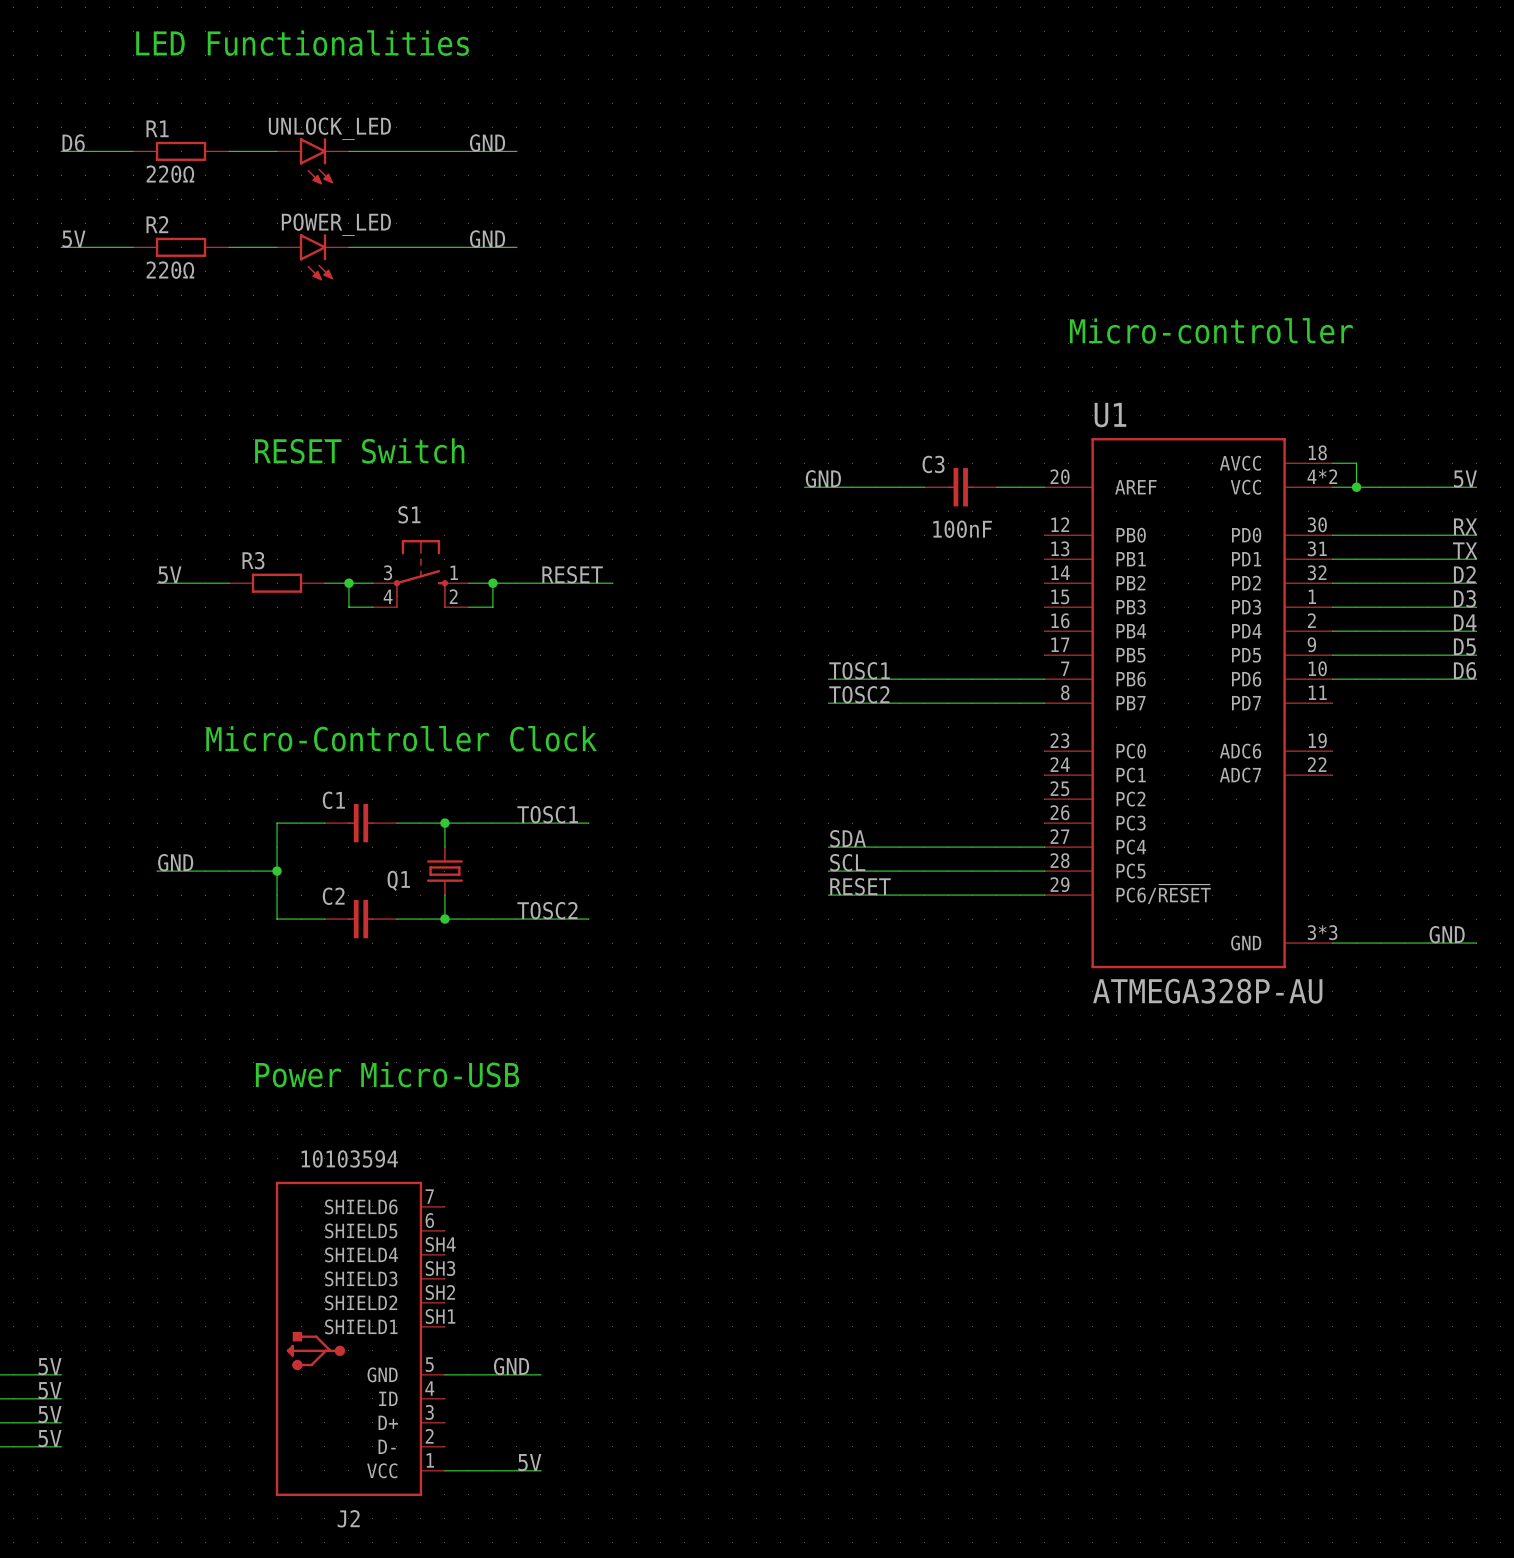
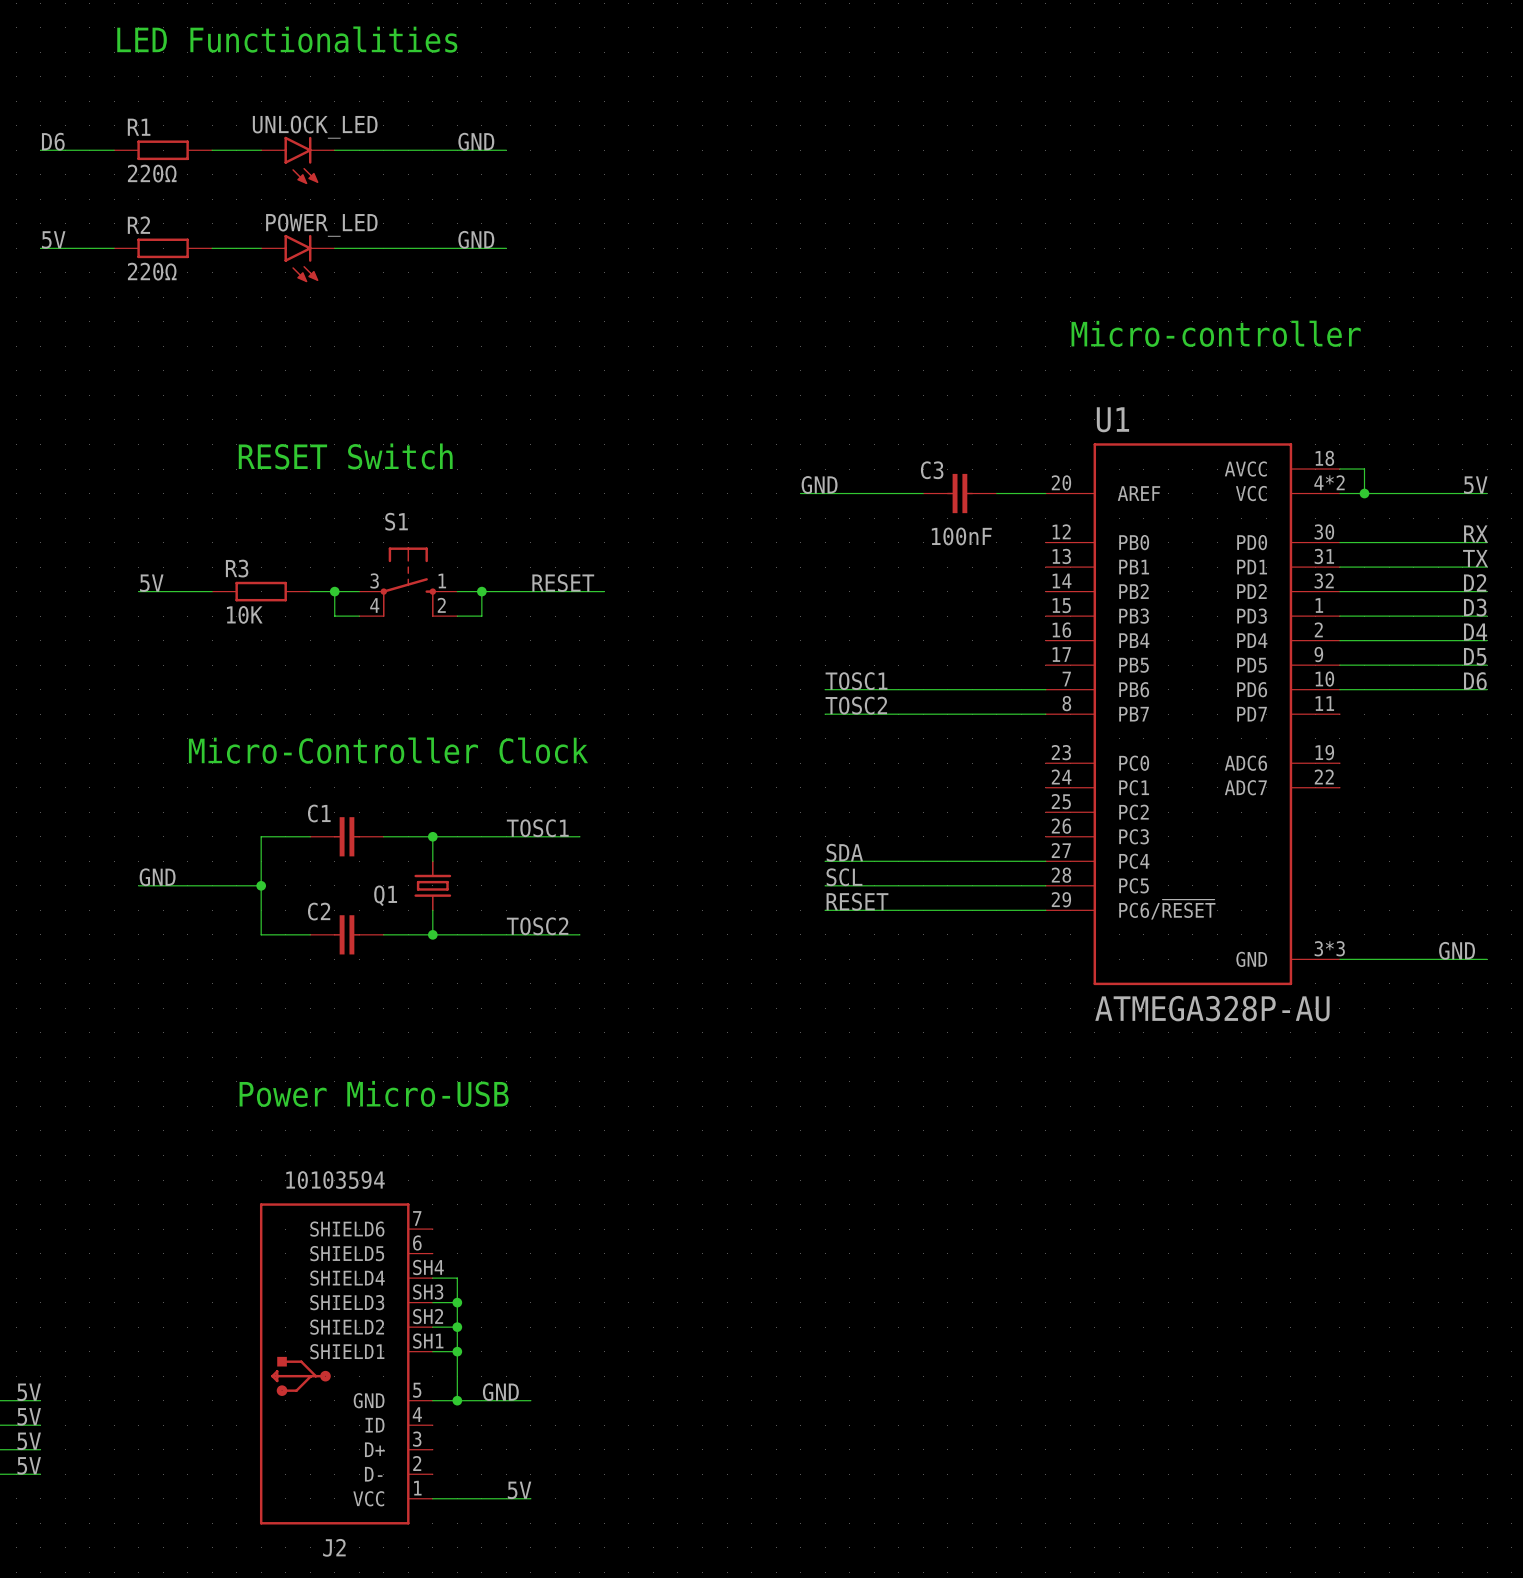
R3 value: none -> 10K (244, 614)
wire: none -> (432, 1278) (457, 1278) (457, 1400)
wire: none -> (432, 1302) (457, 1302)
junction: none -> (457, 1302)
wire: none -> (432, 1327) (457, 1327)
junction: none -> (457, 1327)
wire: none -> (432, 1351) (457, 1351)
junction: none -> (457, 1351)
junction: none -> (457, 1400)

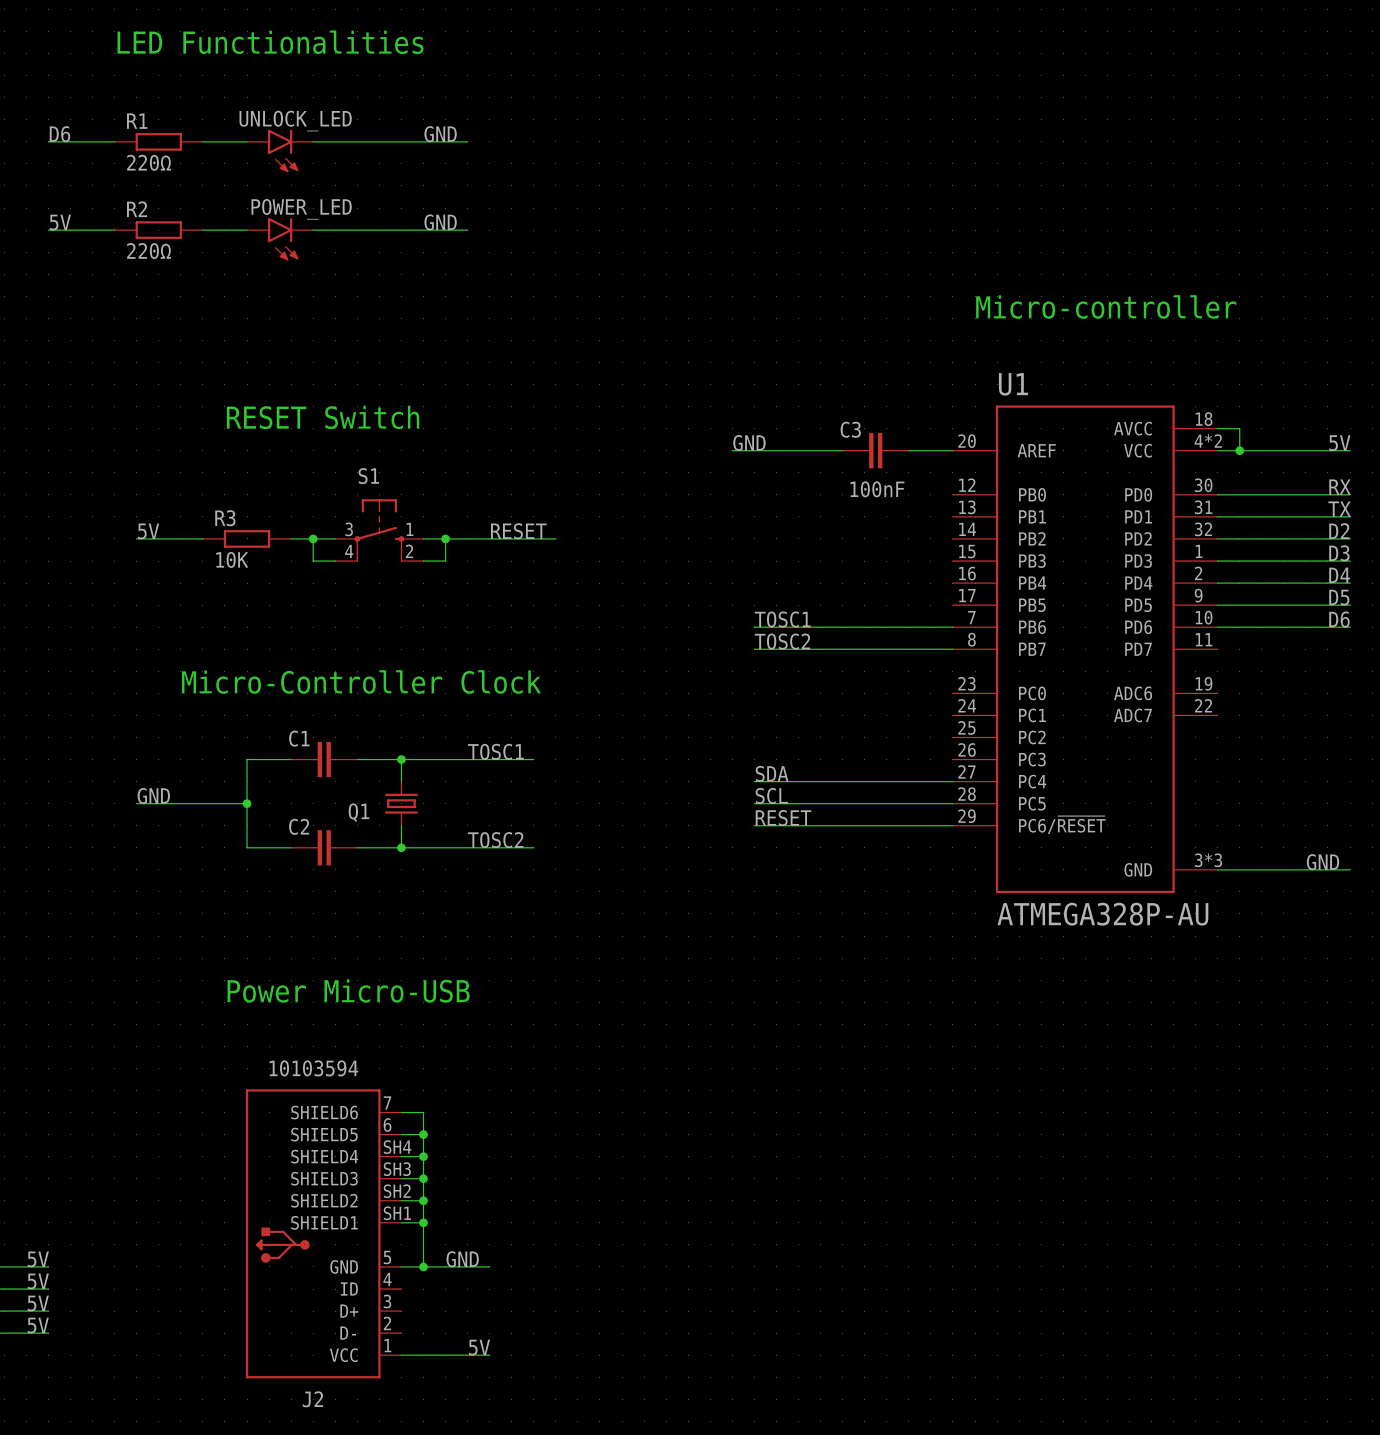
wire: none -> (401, 1112) (423, 1112) (423, 1156)
wire: none -> (401, 1134) (423, 1134)
junction: none -> (423, 1134)
junction: none -> (423, 1156)

